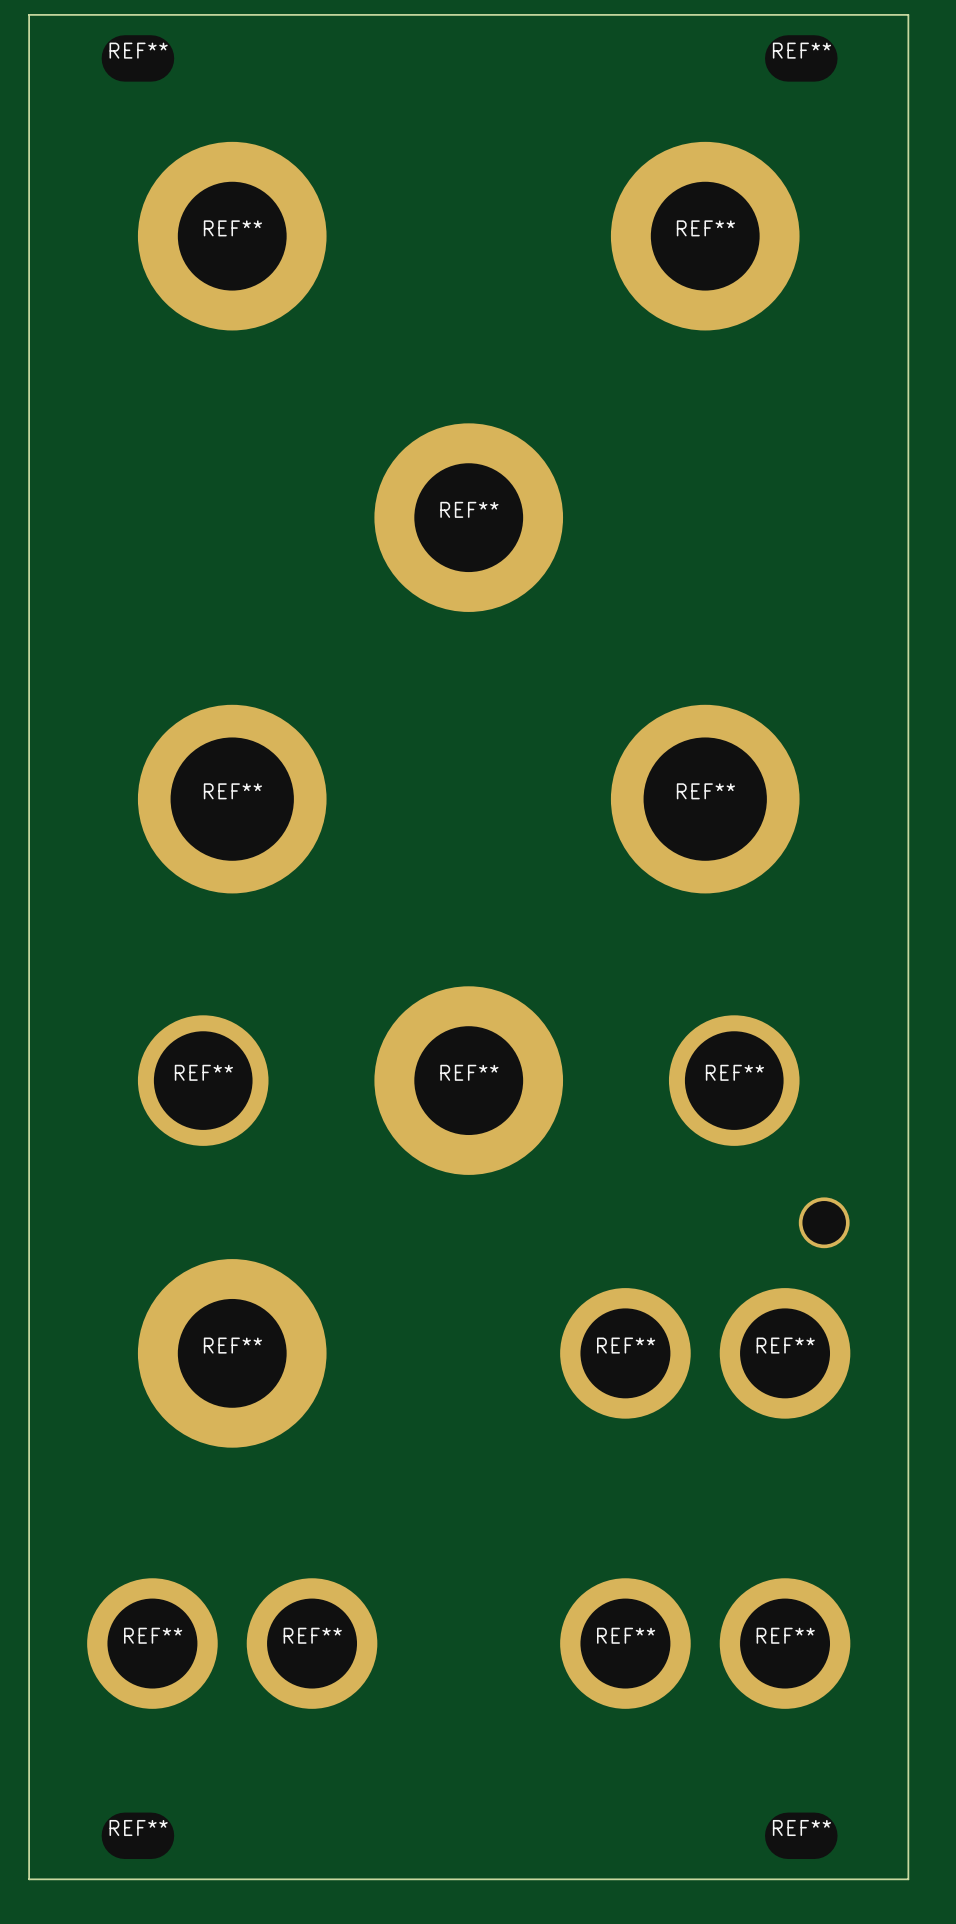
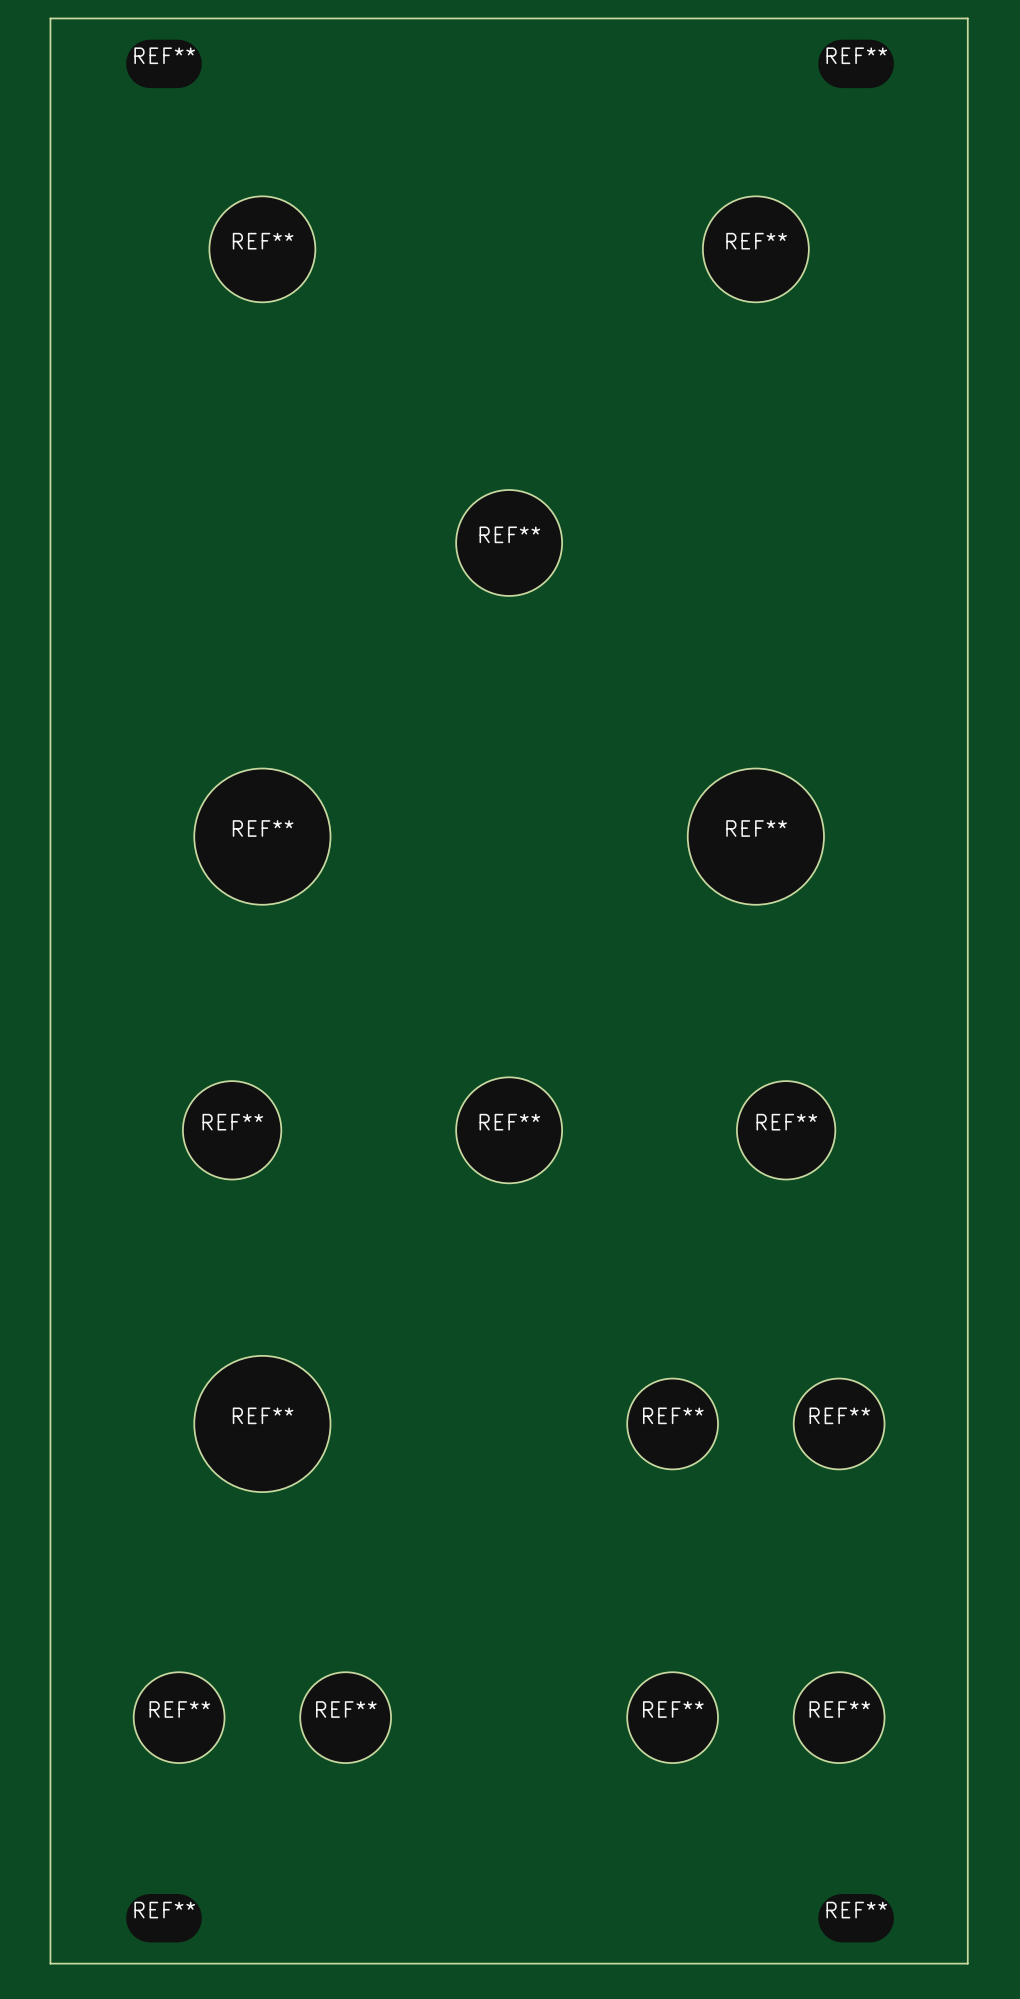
REF** footprint: [137, 141, 327, 331] -> [209, 196, 316, 303]
REF** footprint: [610, 141, 800, 331] -> [702, 196, 809, 303]
REF** footprint: [374, 423, 564, 612] -> [456, 490, 563, 596]
REF** footprint: [137, 704, 327, 894] -> [194, 768, 331, 905]
REF** footprint: [610, 704, 800, 894] -> [687, 768, 824, 905]
REF** footprint: [374, 986, 564, 1175] -> [456, 1077, 563, 1184]
REF** footprint: [137, 1015, 269, 1146] -> [182, 1081, 282, 1180]
REF** footprint: [668, 1015, 800, 1146] -> [736, 1081, 836, 1180]
part: (824, 1222) -> none
REF** footprint: [137, 1259, 327, 1448] -> [194, 1355, 331, 1493]
REF** footprint: [560, 1288, 691, 1419] -> [627, 1378, 719, 1470]
REF** footprint: [719, 1288, 851, 1419] -> [793, 1378, 885, 1470]
REF** footprint: [87, 1578, 218, 1709] -> [133, 1672, 225, 1764]
REF** footprint: [246, 1578, 378, 1709] -> [300, 1672, 392, 1764]
REF** footprint: [560, 1578, 691, 1709] -> [627, 1672, 719, 1764]
REF** footprint: [719, 1578, 851, 1709] -> [793, 1672, 885, 1764]

